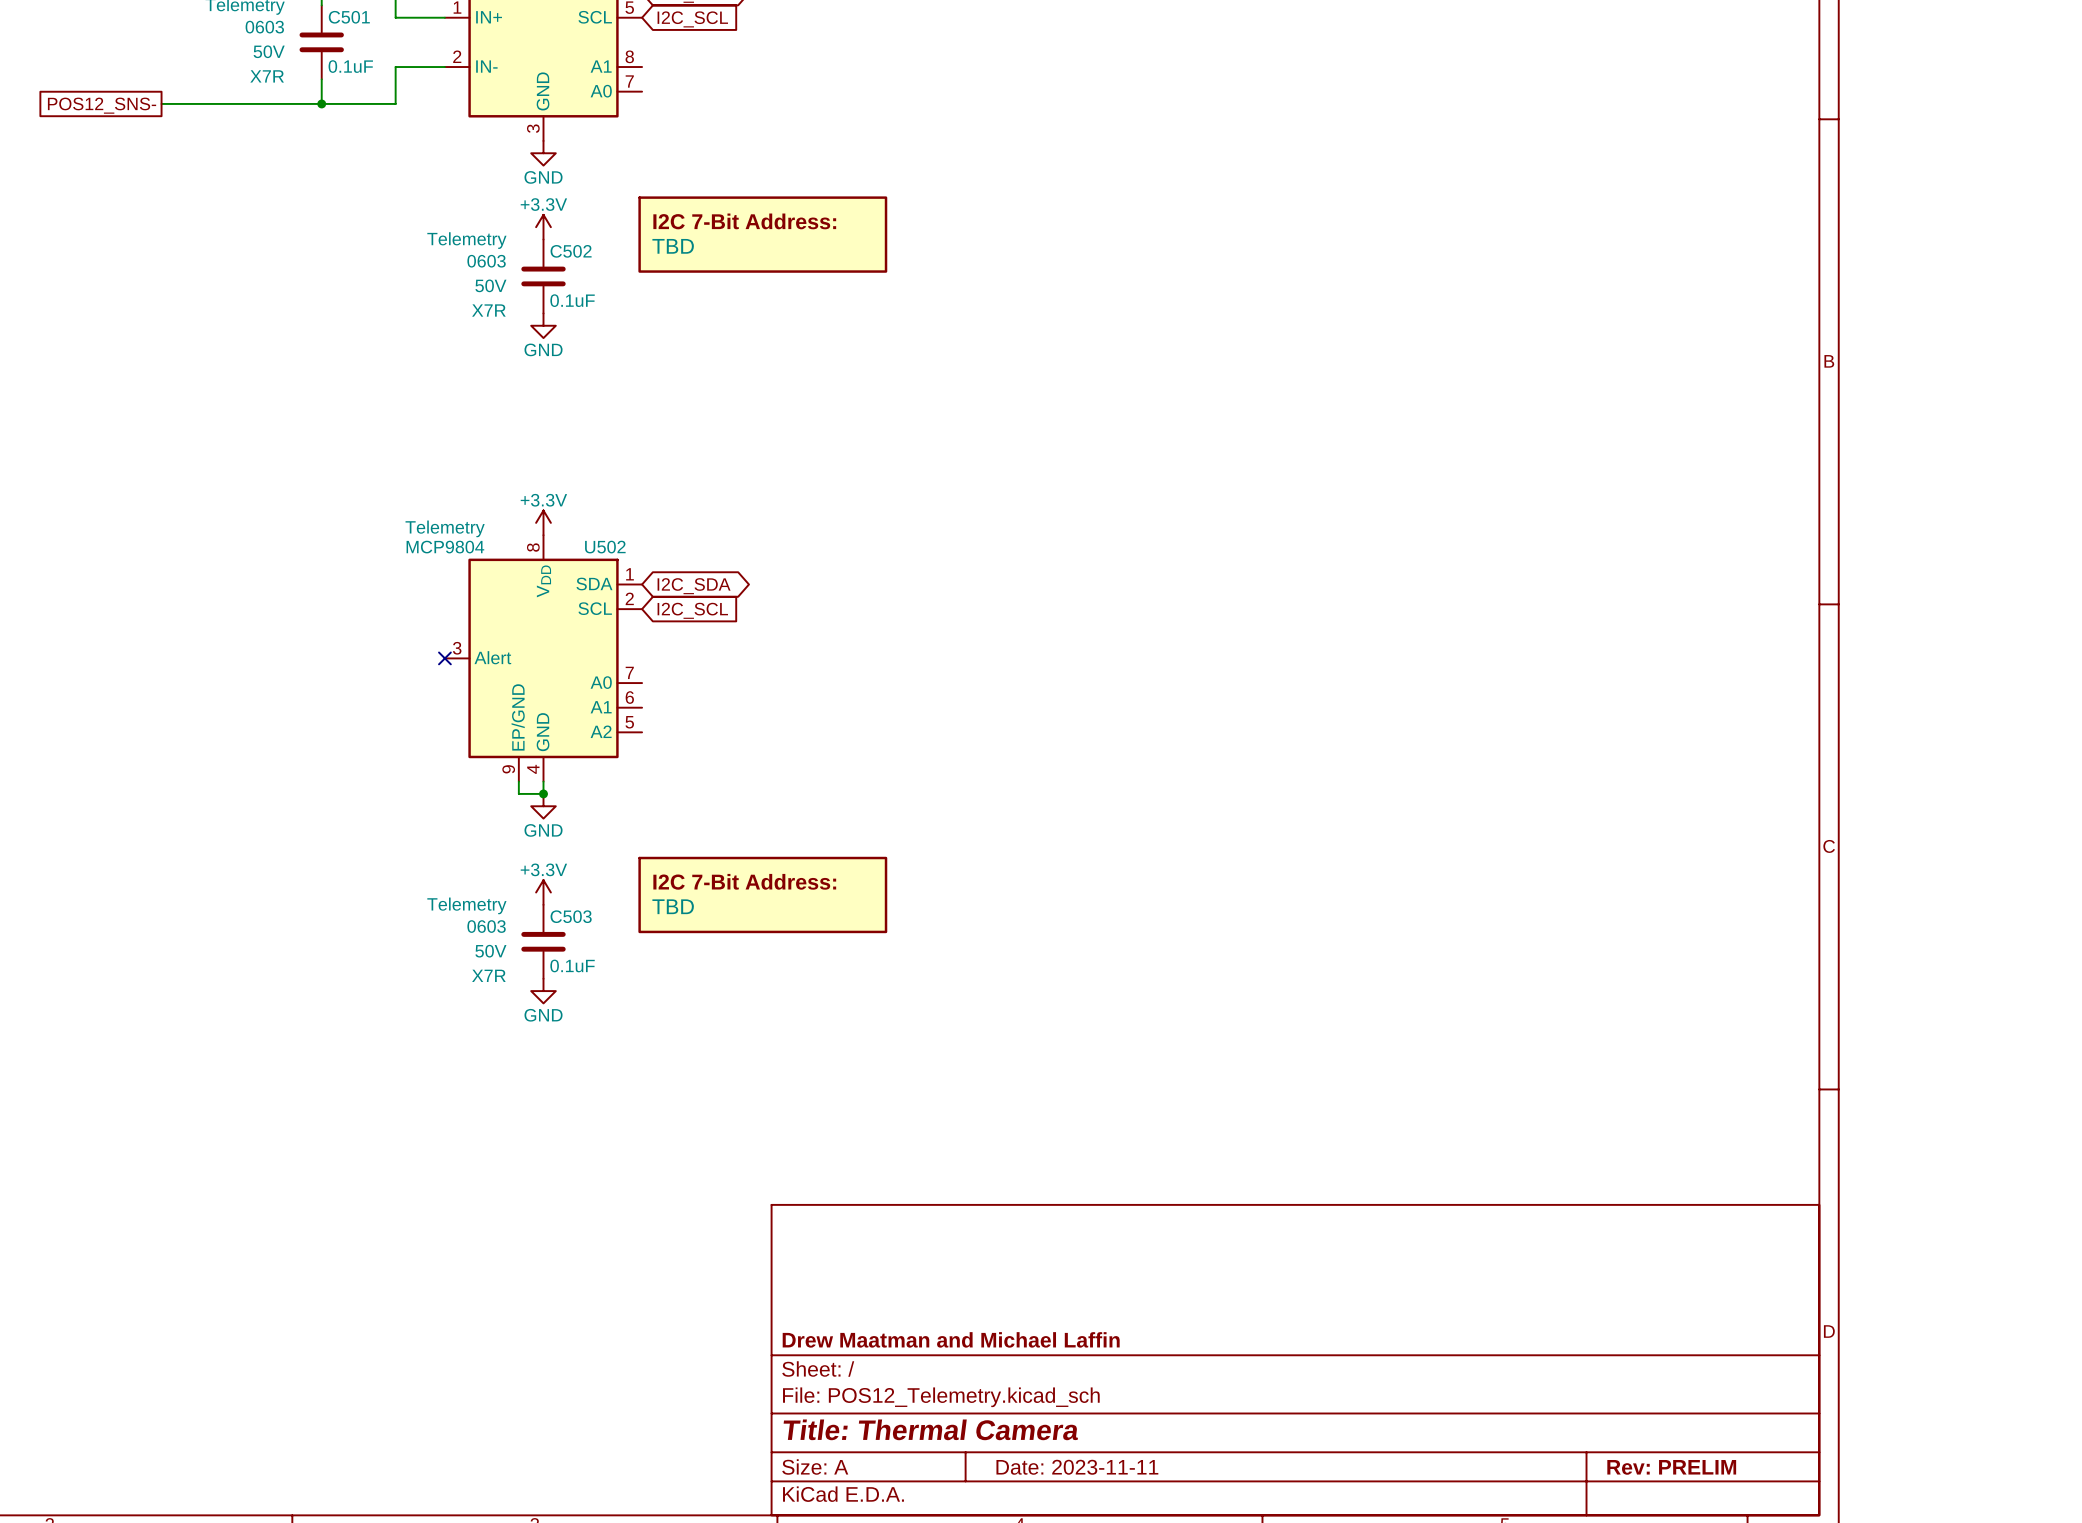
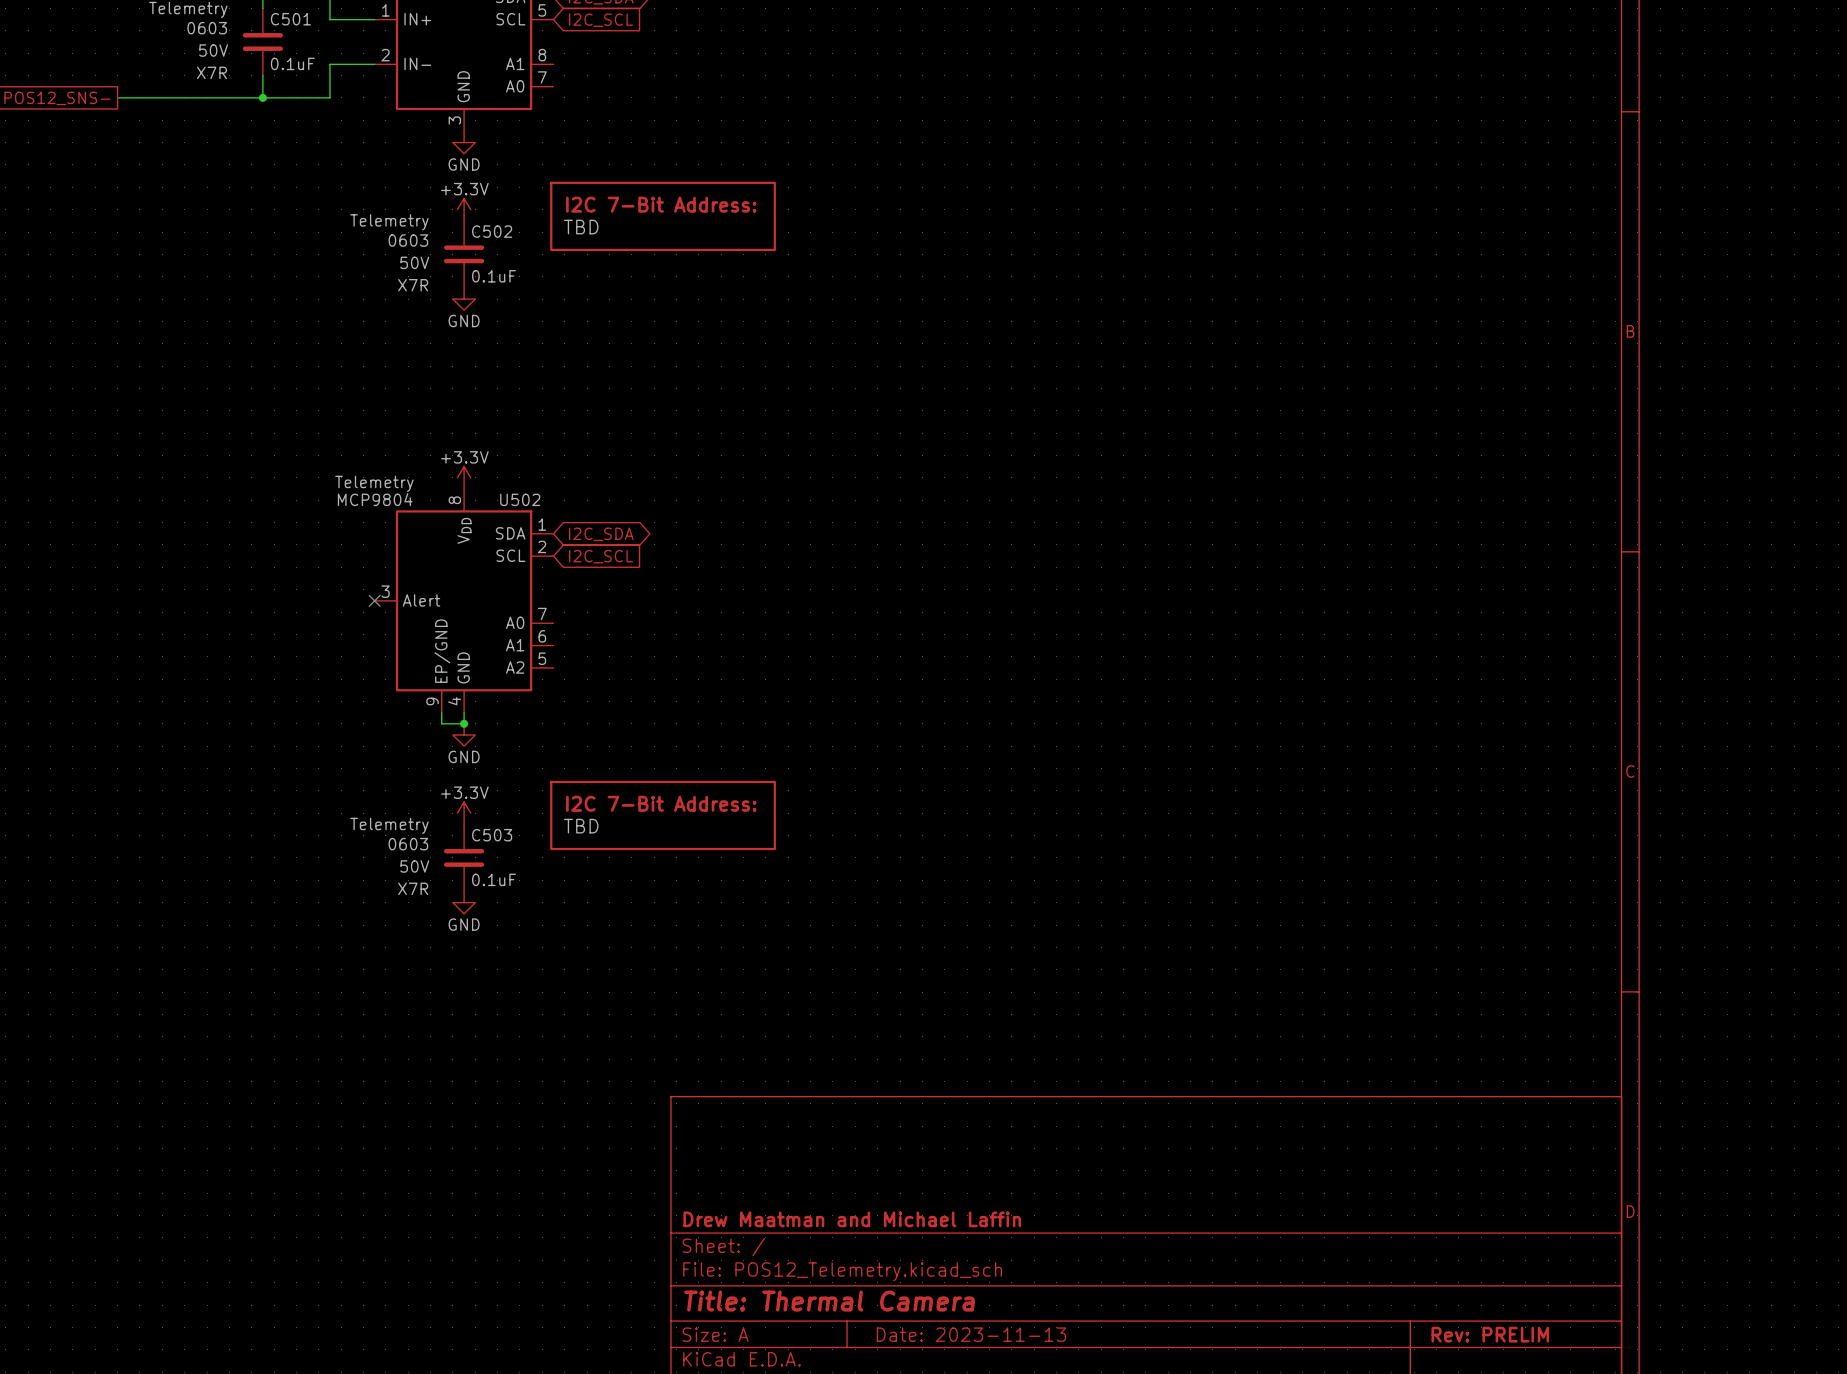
title block: Date: 2023-11-11 (1077, 1467) -> Date: 2023-11-13 (971, 1334)

